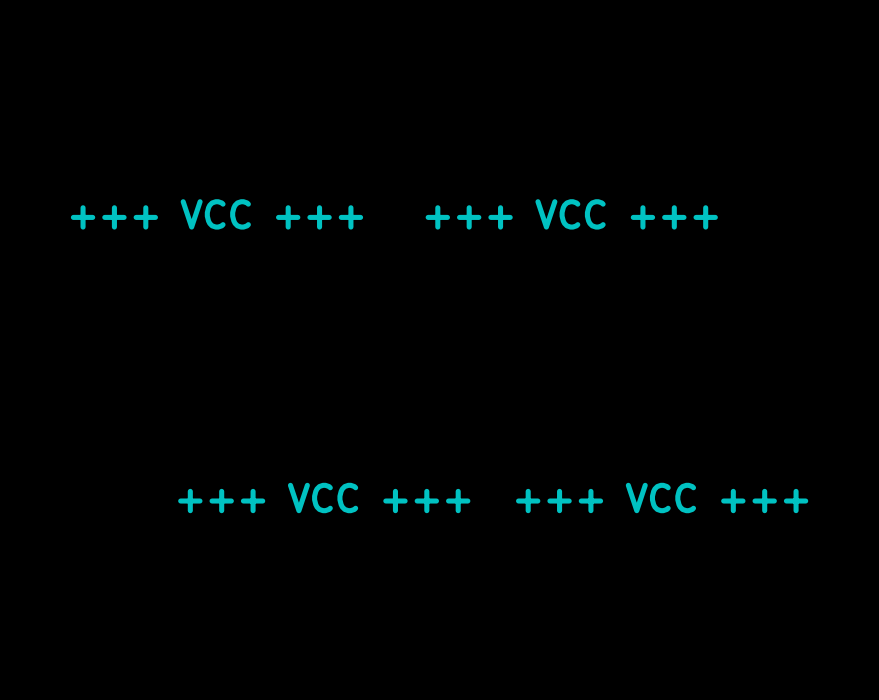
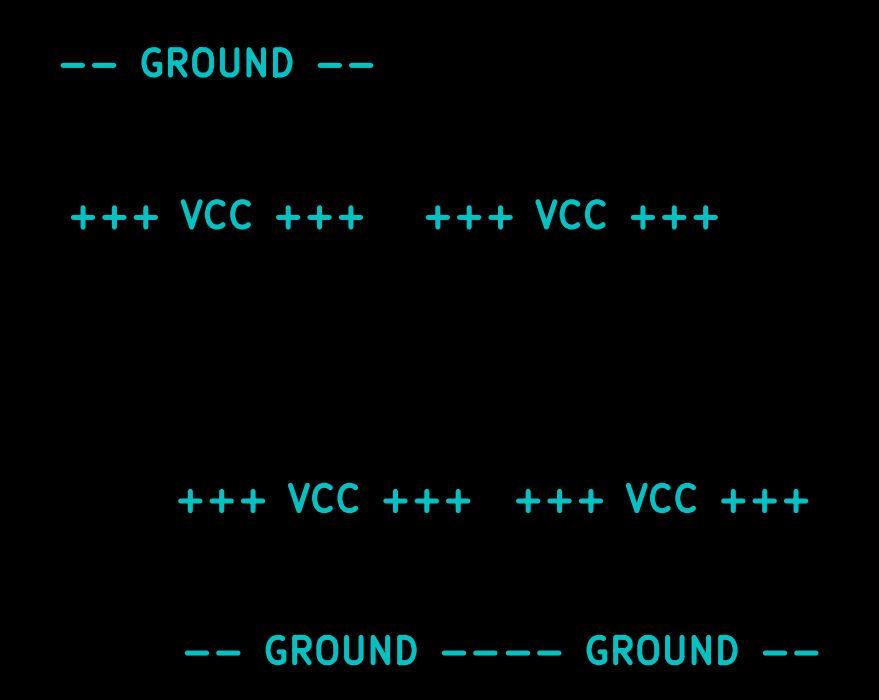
text: none -> -- GROUND -- (216, 62)
text: none -> -- GROUND -- (341, 650)
text: none -> -- GROUND -- (662, 650)

